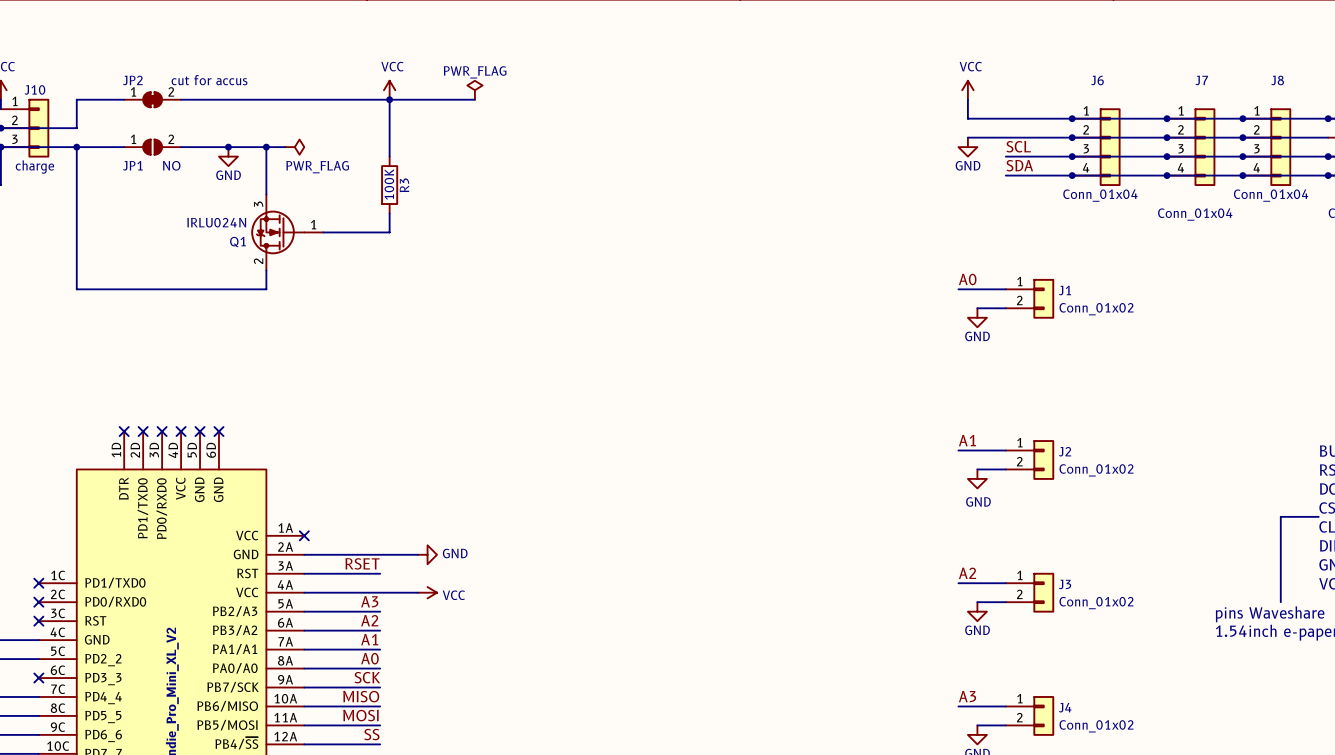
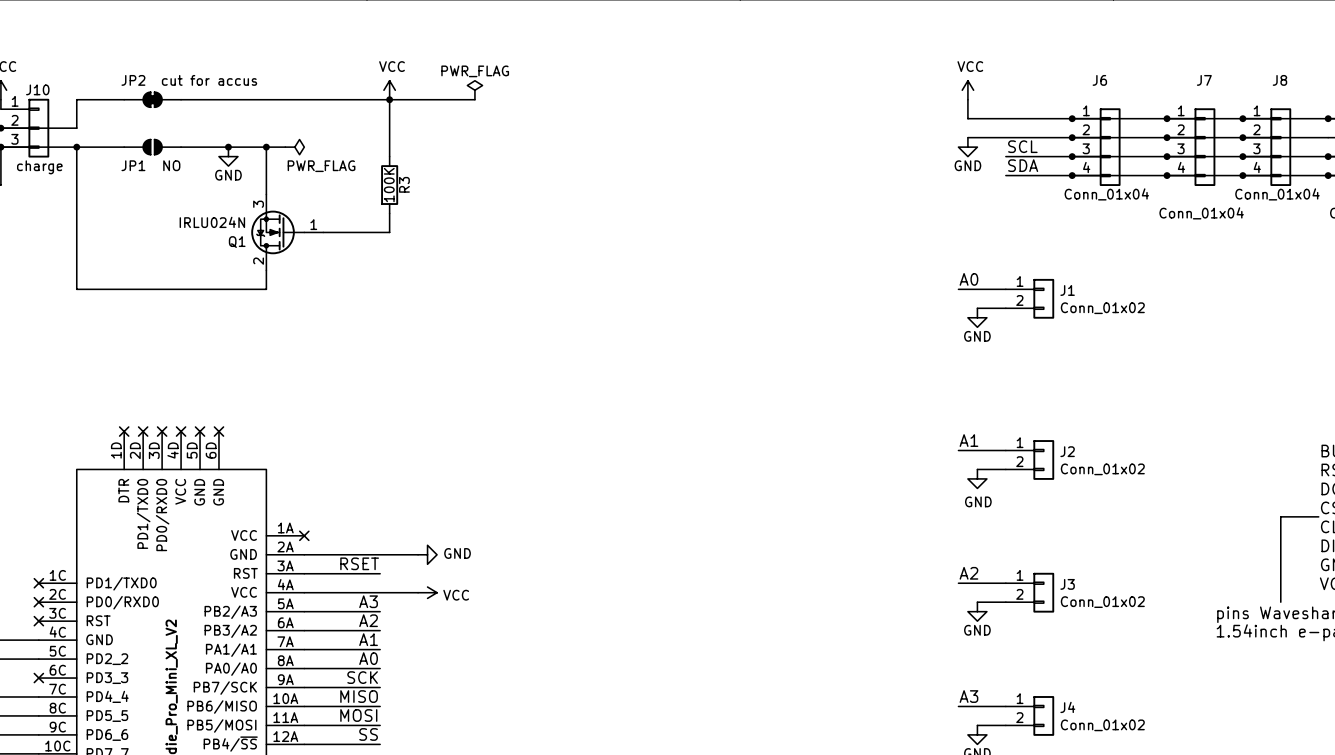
JP2 pin number: 1 (133, 91) -> none
JP2 pin number: 2 (171, 91) -> none
JP1 pin number: 1 (133, 139) -> none
JP1 pin number: 2 (171, 139) -> none

